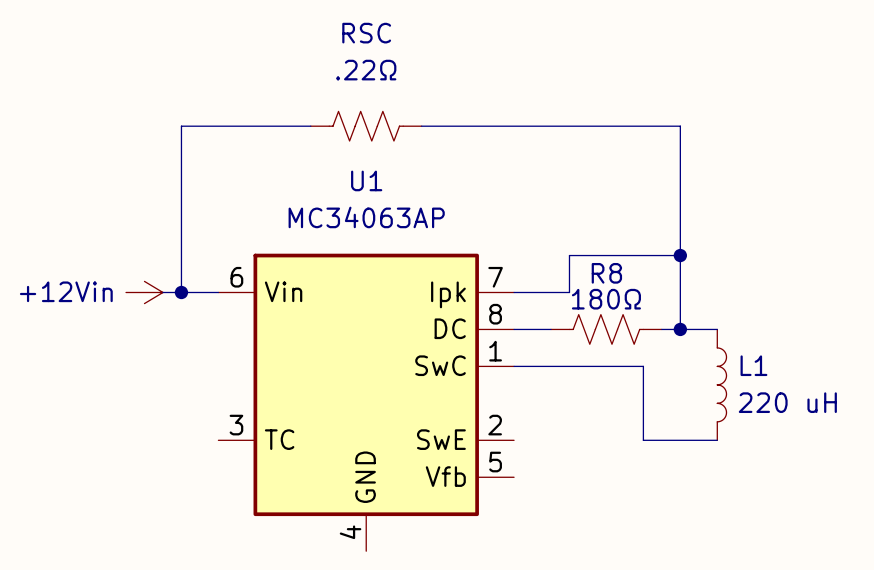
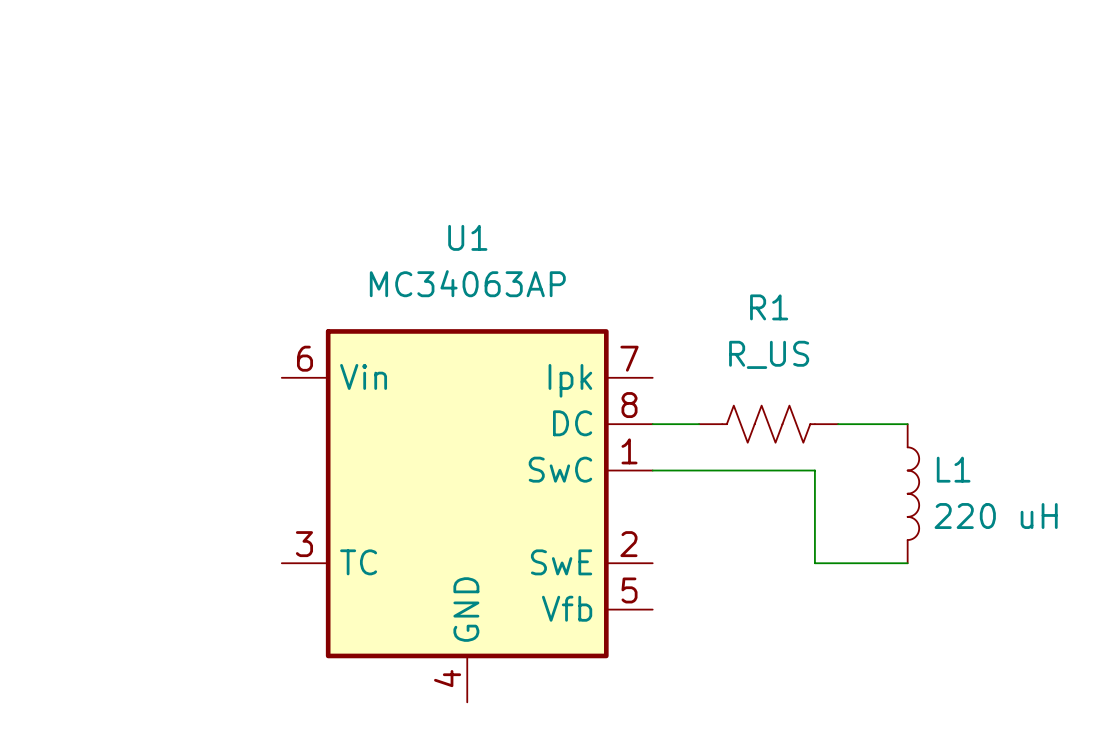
wire: (310, 126) (181, 126) (181, 292) -> none
RSC: .22Ω (366, 126) -> none
wire: (421, 126) (680, 126) (680, 329) -> none
wire: (680, 255) (569, 255) (569, 292) (514, 292) -> none
junction: (680, 255) -> none
R8 name: R8 (606, 273) -> R1 (769, 307)
power symbol: +12Vin (144, 292) -> none
wire: (162, 292) (218, 292) -> none
junction: (181, 292) -> none
R8 value: 180Ω (606, 299) -> R_US (769, 354)
junction: (680, 329) -> none

